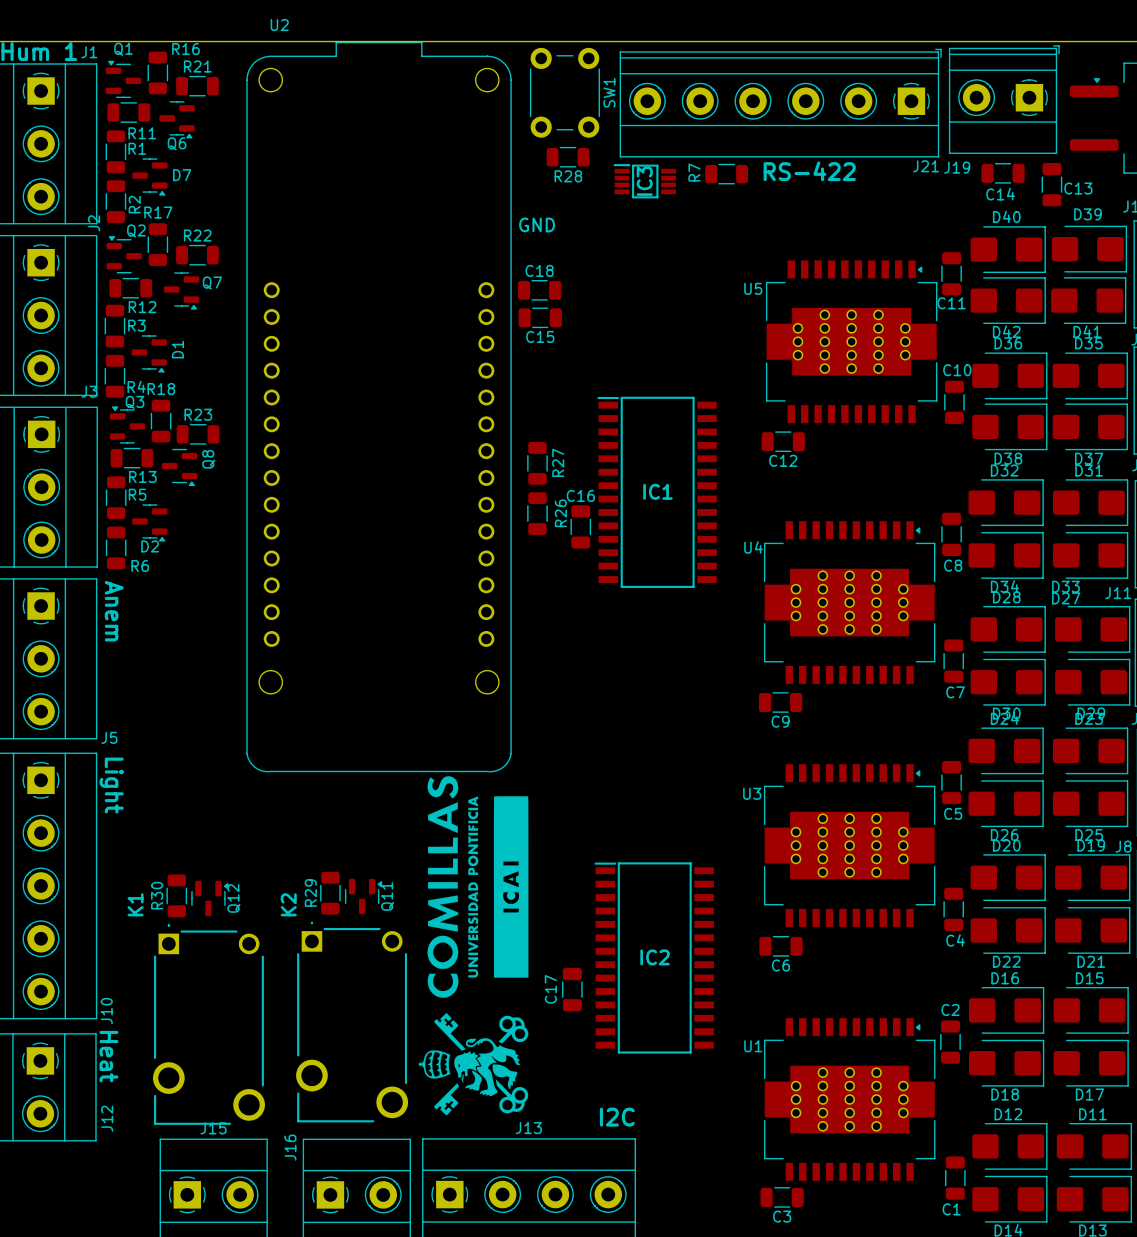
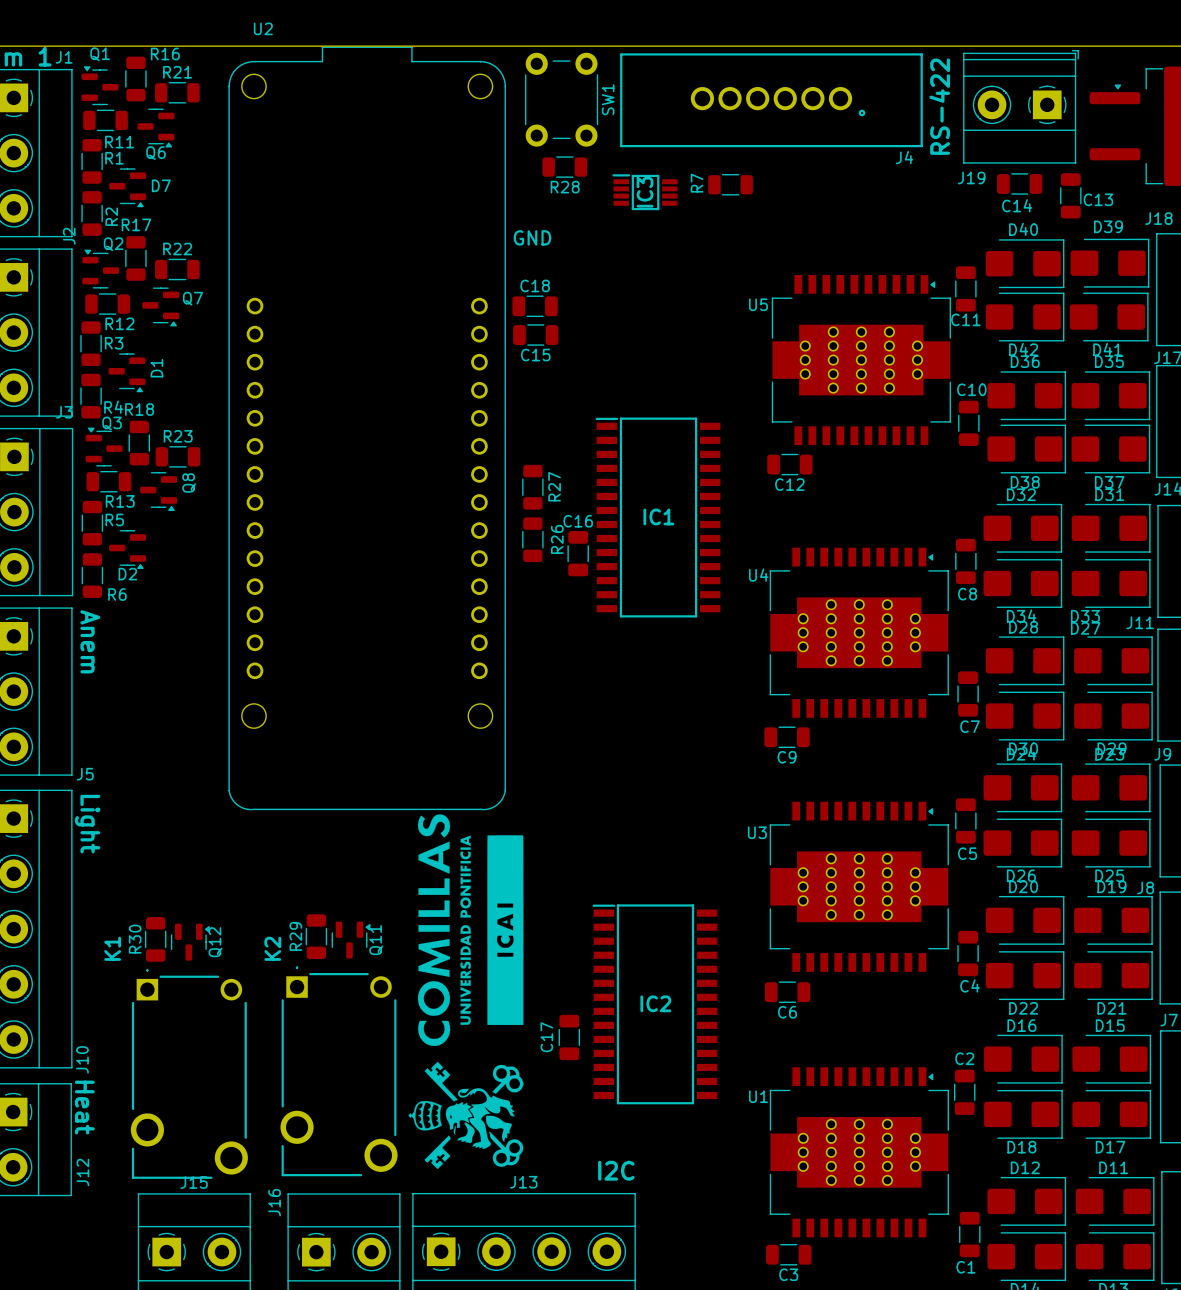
J4: none -> (771, 100)
J21: (780, 103) -> none
text rotation: 0° (809, 171) -> 90° counterclockwise (939, 106)
text position: RS-422 (809, 171) -> RS-422 (939, 106)

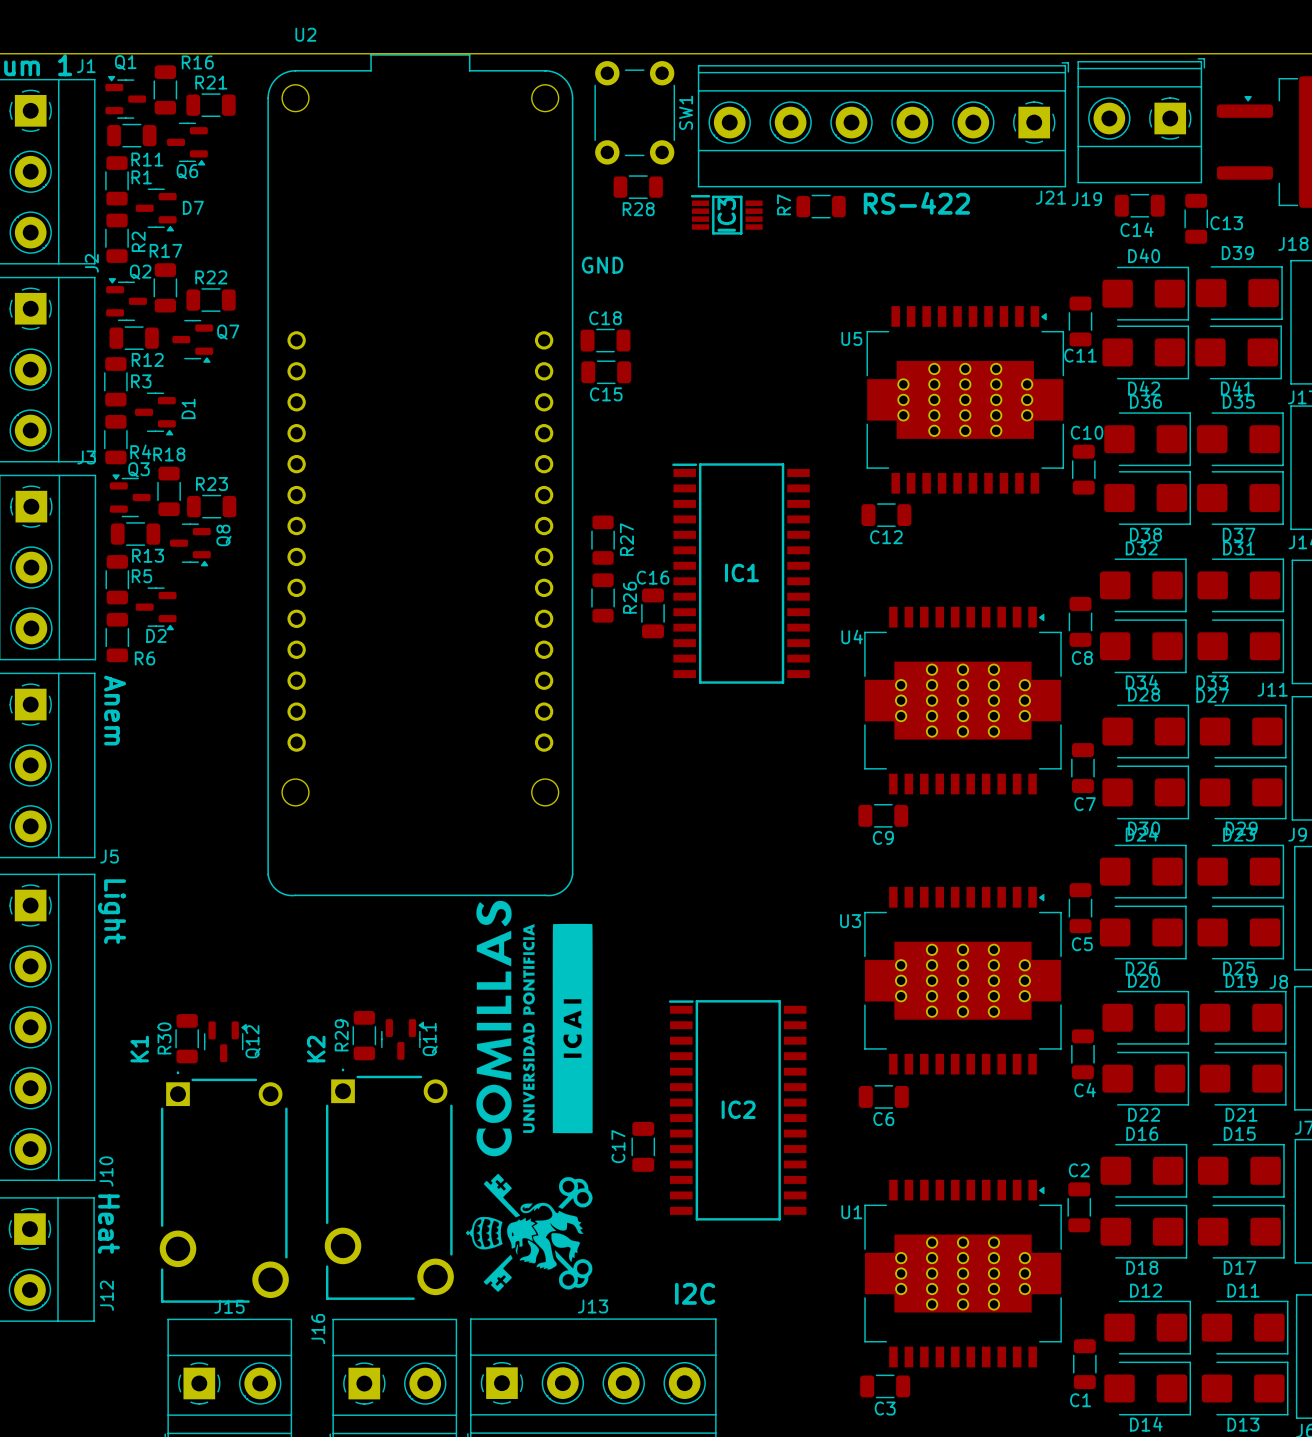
J4: (771, 100) -> none
text rotation: 0° (939, 106) -> 90° clockwise (916, 203)
text position: RS-422 (939, 106) -> RS-422 (916, 203)
J21: none -> (883, 124)

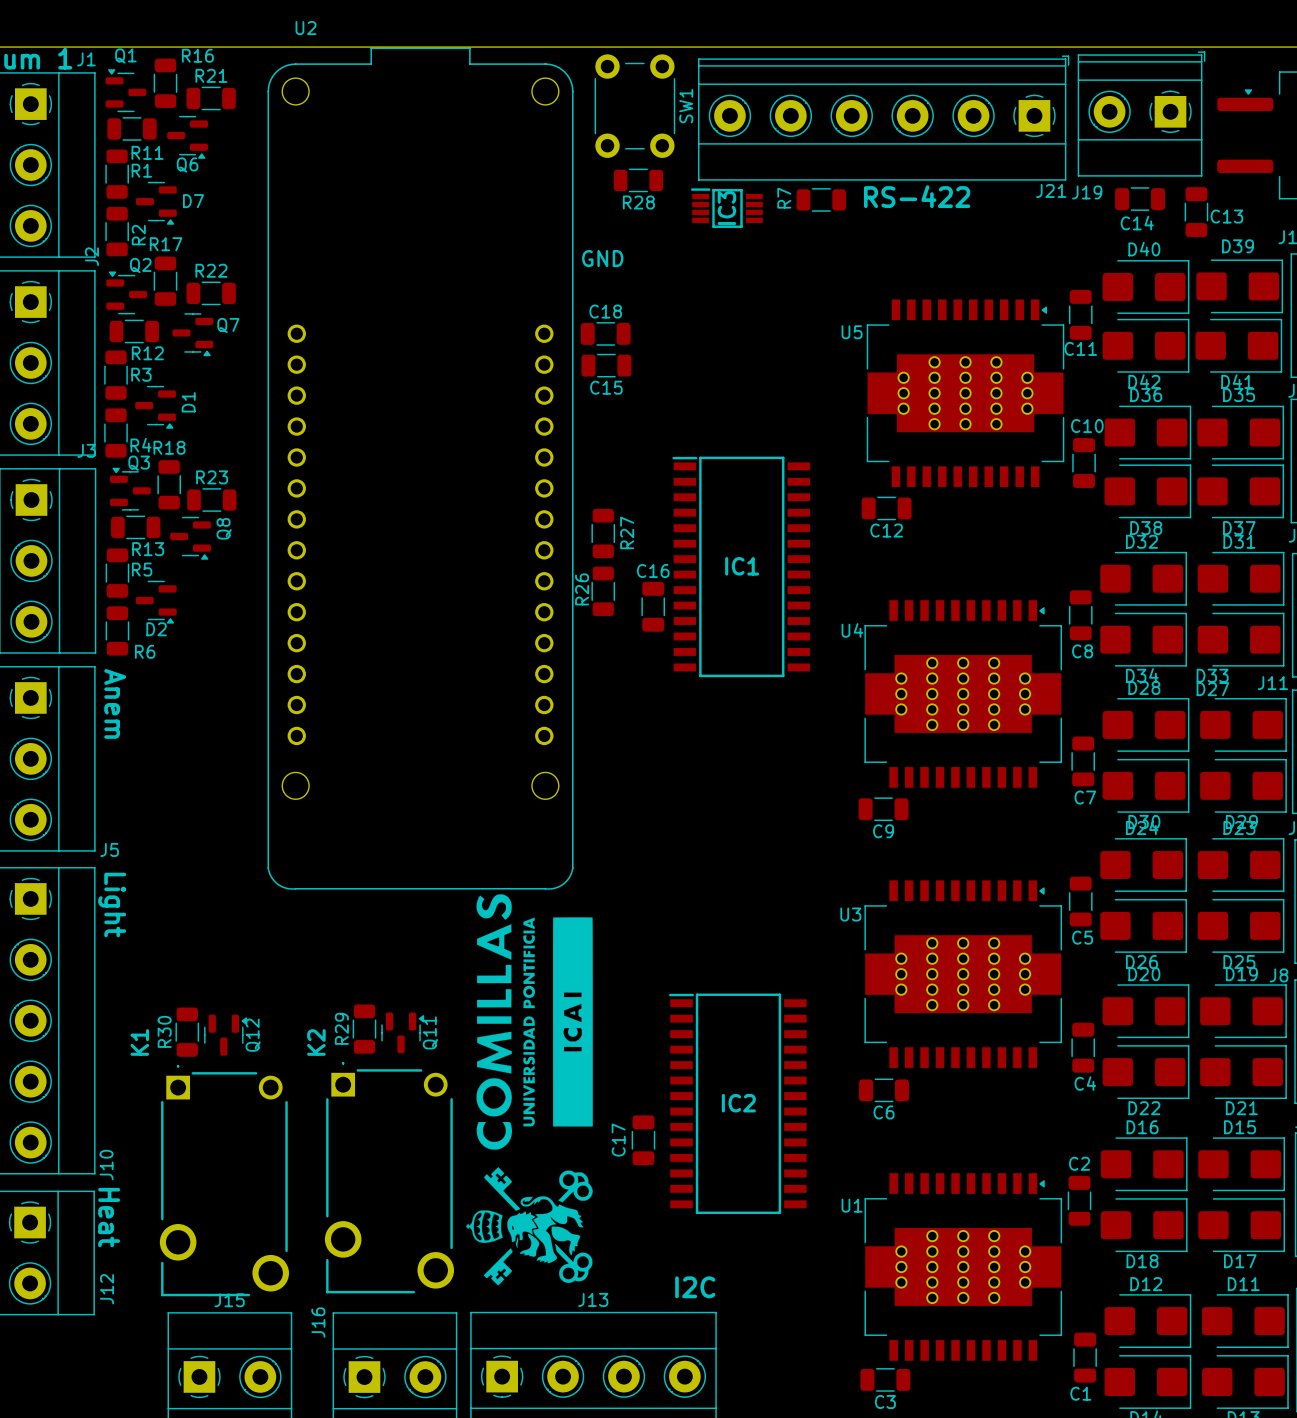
R26 name position: R26 (630, 597) -> R26 (582, 589)

